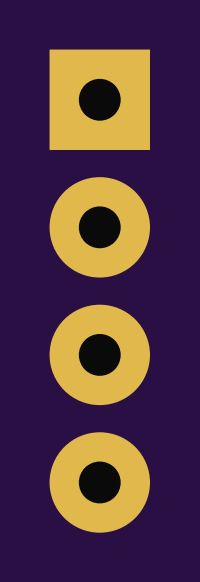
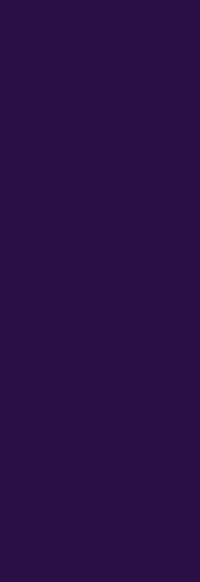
part: (99, 291) -> none

